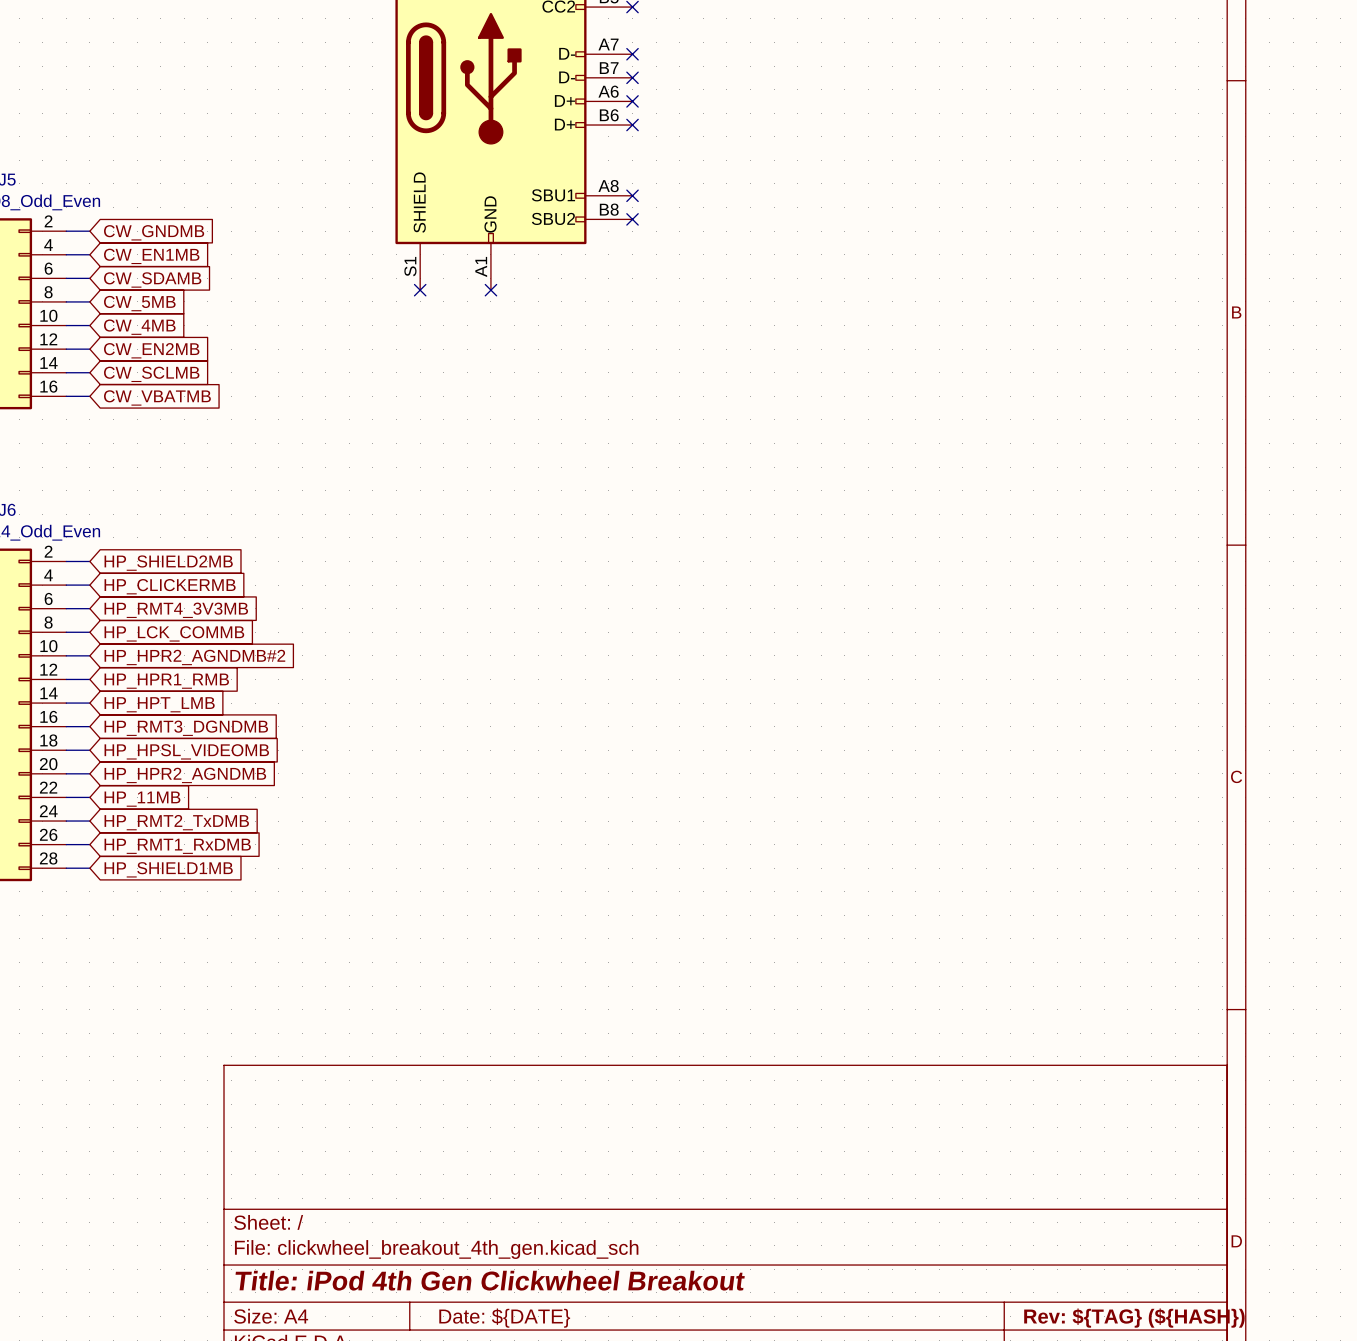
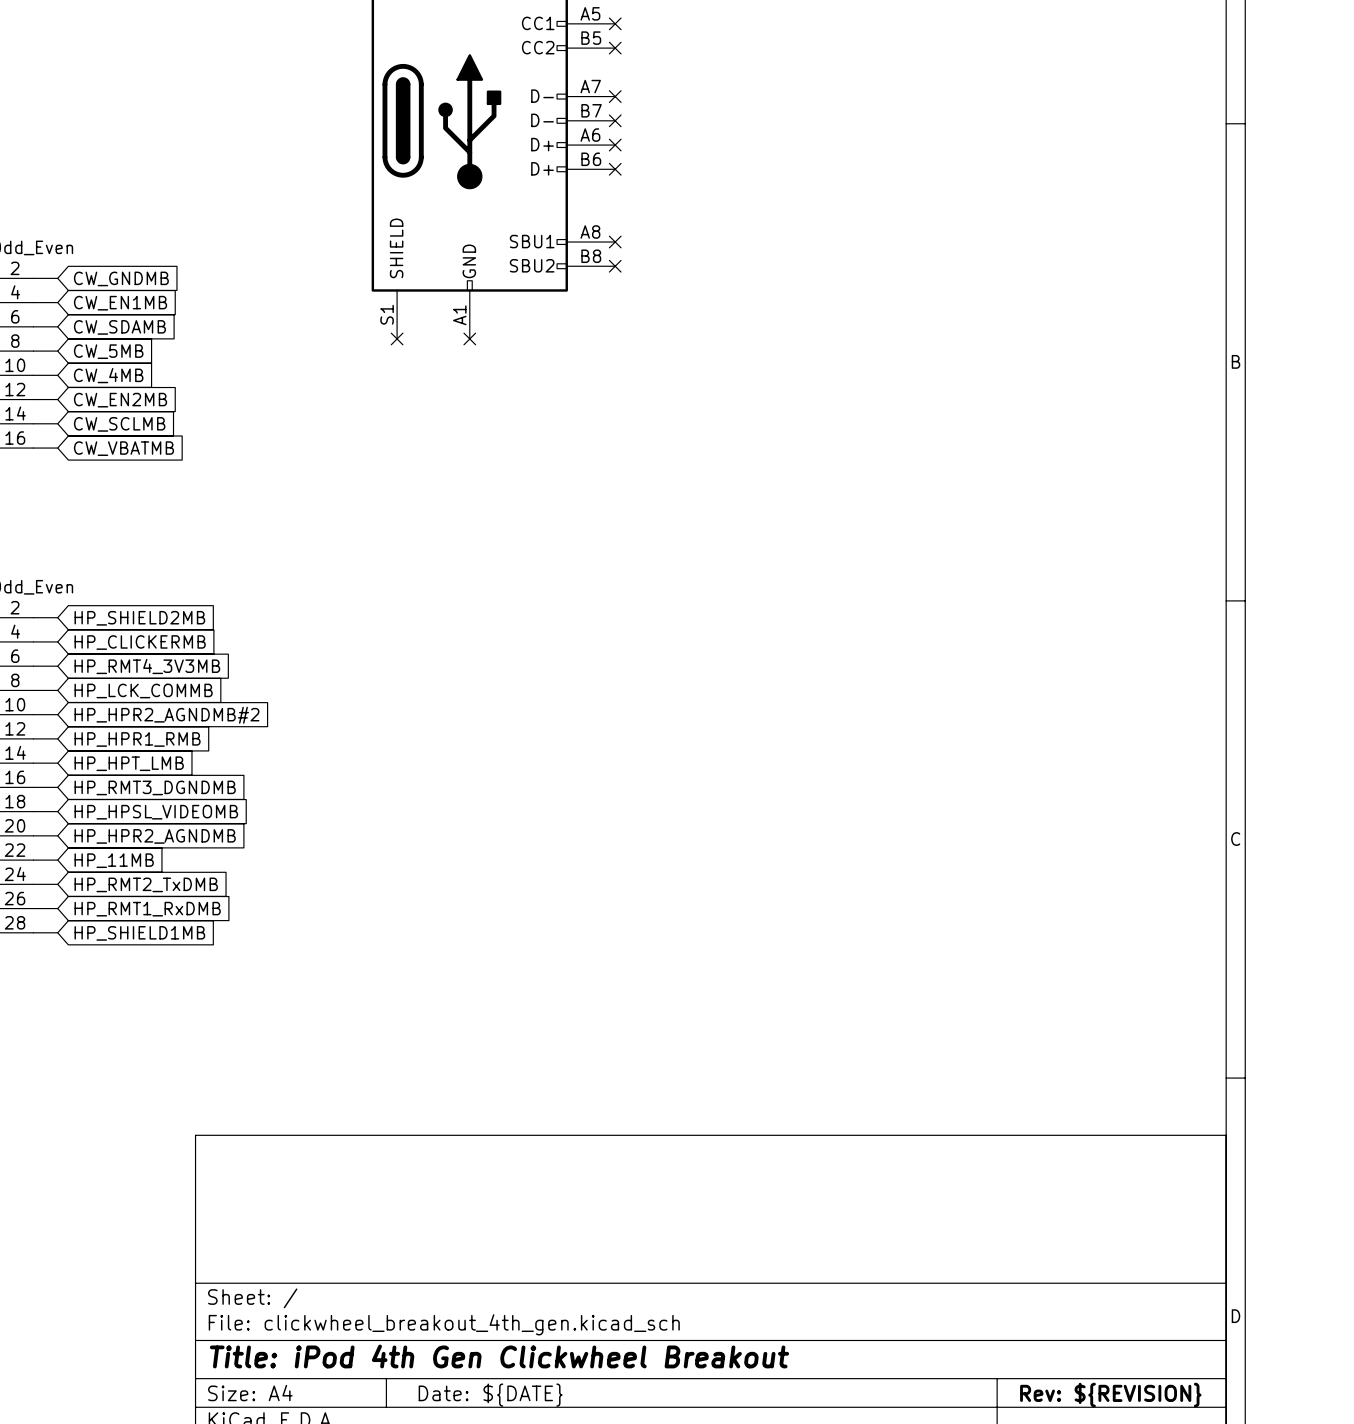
title block: Rev: ${TAG} (${HASH}) (1134, 1318) -> Rev: ${REVISION} (1110, 1395)

